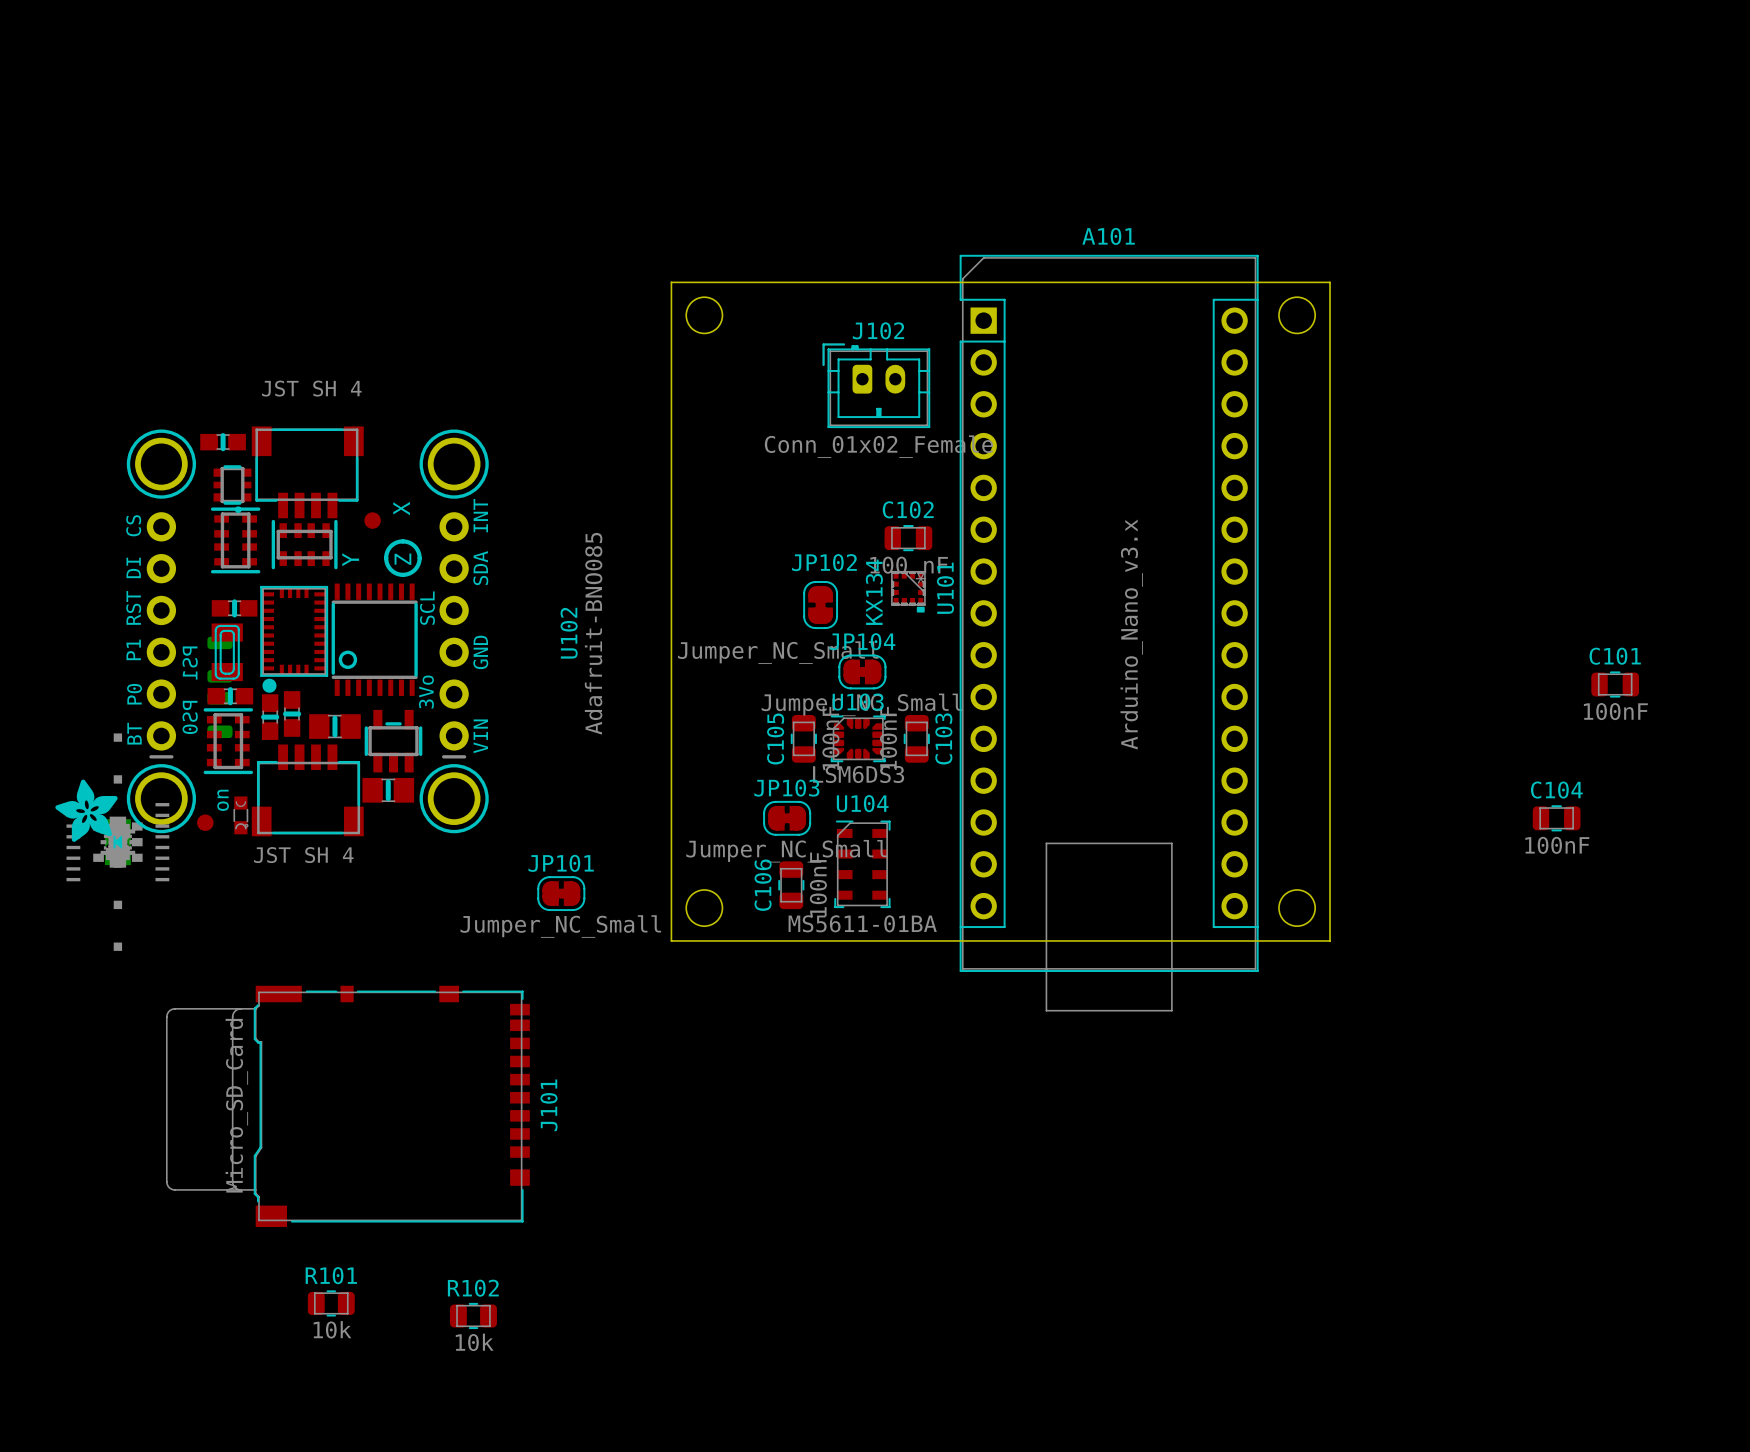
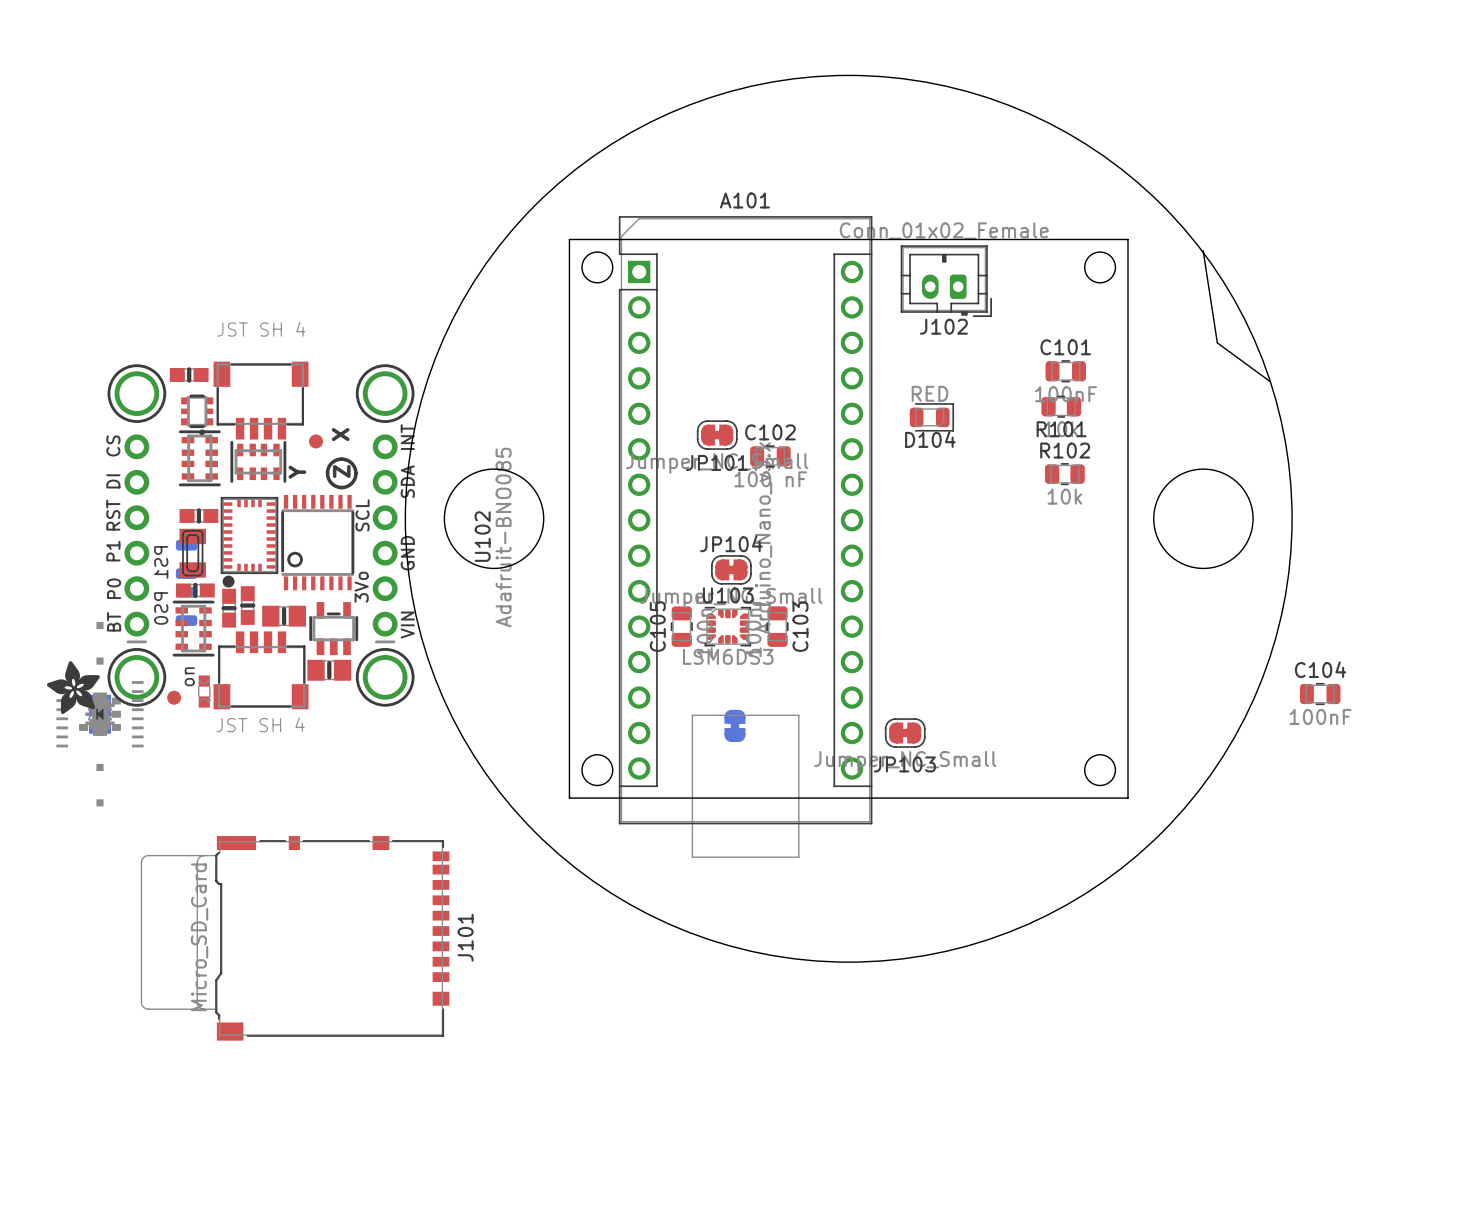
round board edge: none -> [404, 74, 1293, 963]
board edge: none -> (1203, 250) (1217, 342) (1270, 381)
J102 rotation: 0° (876, 385) -> 180° (946, 281)
J102 position: (876, 385) -> (946, 281)
D104: none -> RED (931, 417)
round board edge: none -> [443, 468, 545, 570]
round board edge: none -> [1153, 468, 1254, 570]
U101: KX134 (908, 591) -> none
JP102: Jumper_NC_Small (820, 605) -> none
A101 position: (1109, 633) -> (745, 536)
C101 position: (1615, 684) -> (1065, 371)
JP103 name position: JP103 (786, 788) -> JP103 (904, 764)
JP103 position: (787, 818) -> (905, 733)
part: none -> (734, 725)
JP101 name position: JP101 (561, 863) -> JP101 (716, 462)
U104: MS5611-01BA (862, 864) -> none
C106: 100nF (791, 885) -> none
JP101 position: (561, 893) -> (717, 435)
R101 name position: R101 (331, 1275) -> R101 (1061, 429)
R101 position: (331, 1303) -> (1061, 406)
R102 position: (473, 1315) -> (1064, 474)

